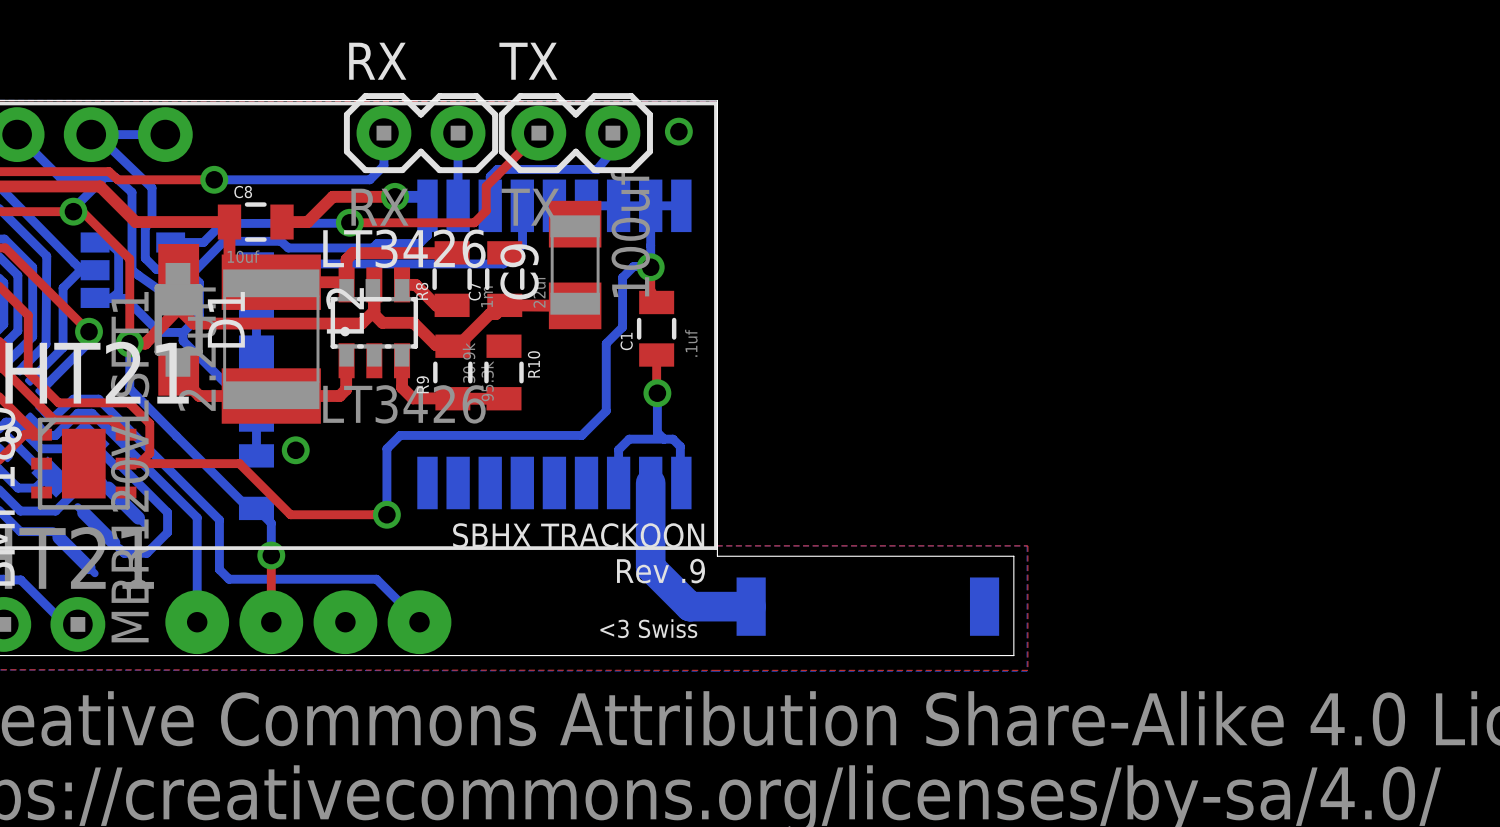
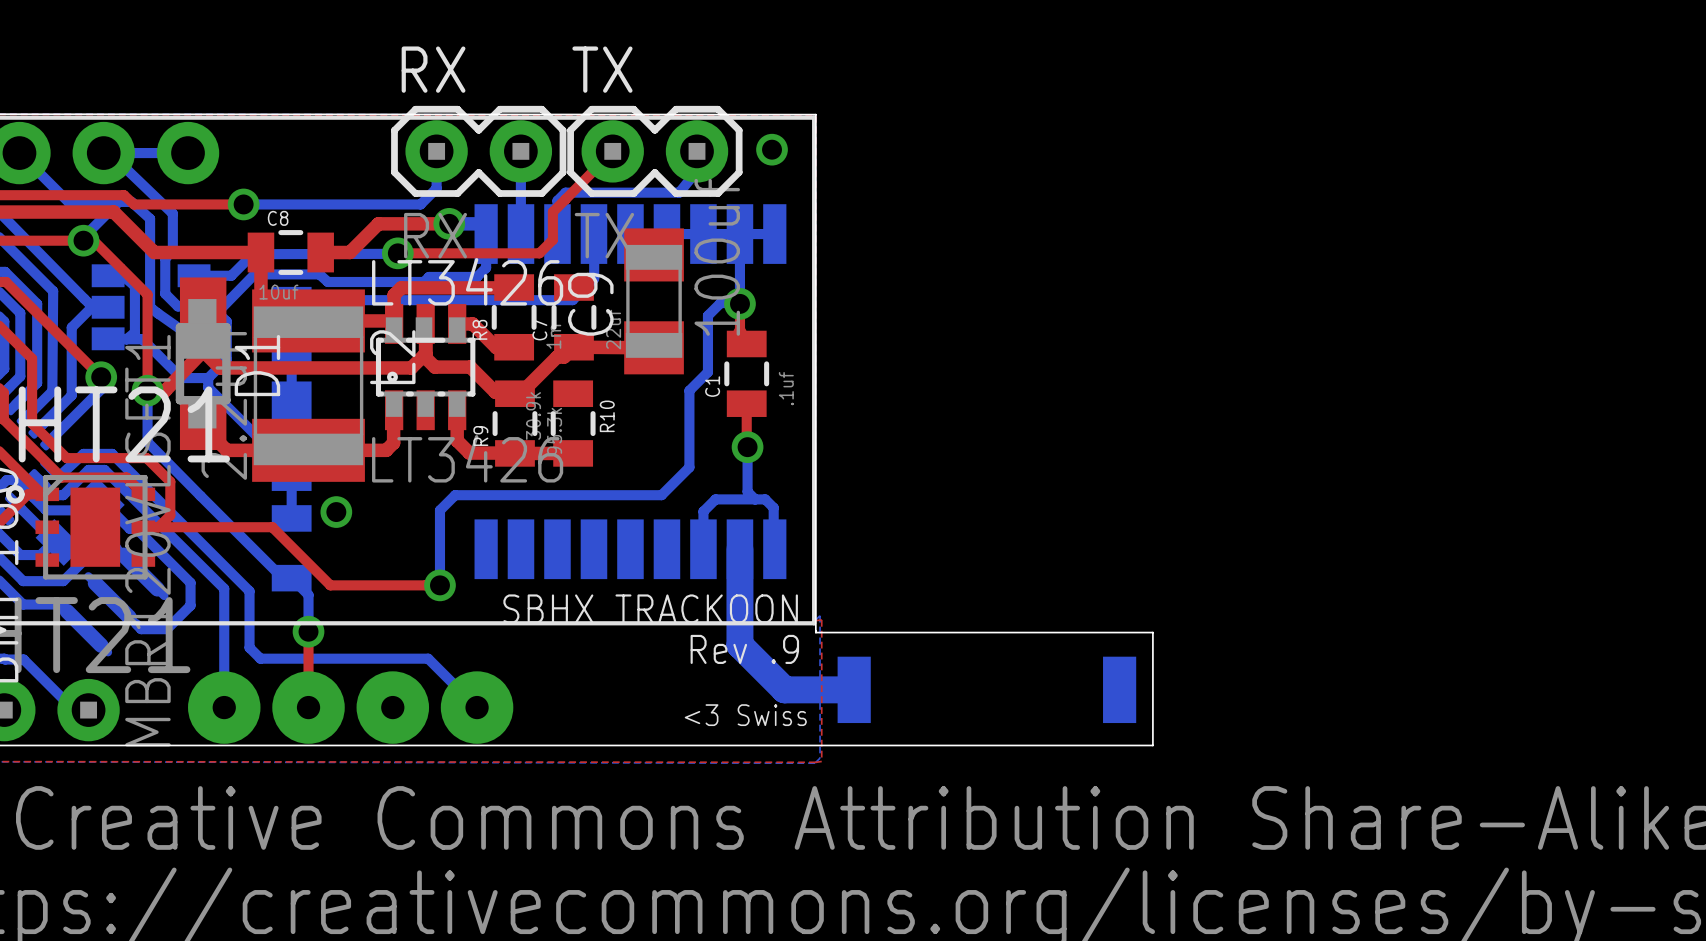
bottom track width: thick (650, 482) (650, 567) (690, 606) (751, 606) -> thin (739, 549) (739, 645) (784, 689) (854, 689)
top zone outline: (716, 545) (1027, 545) (1027, 670) (717, 670) -> (814, 620) (821, 619) (821, 761) (815, 762)
bottom zone outline: (716, 545) (1027, 545) (1027, 671) (716, 671) -> (814, 620) (820, 615) (820, 758) (814, 763)

